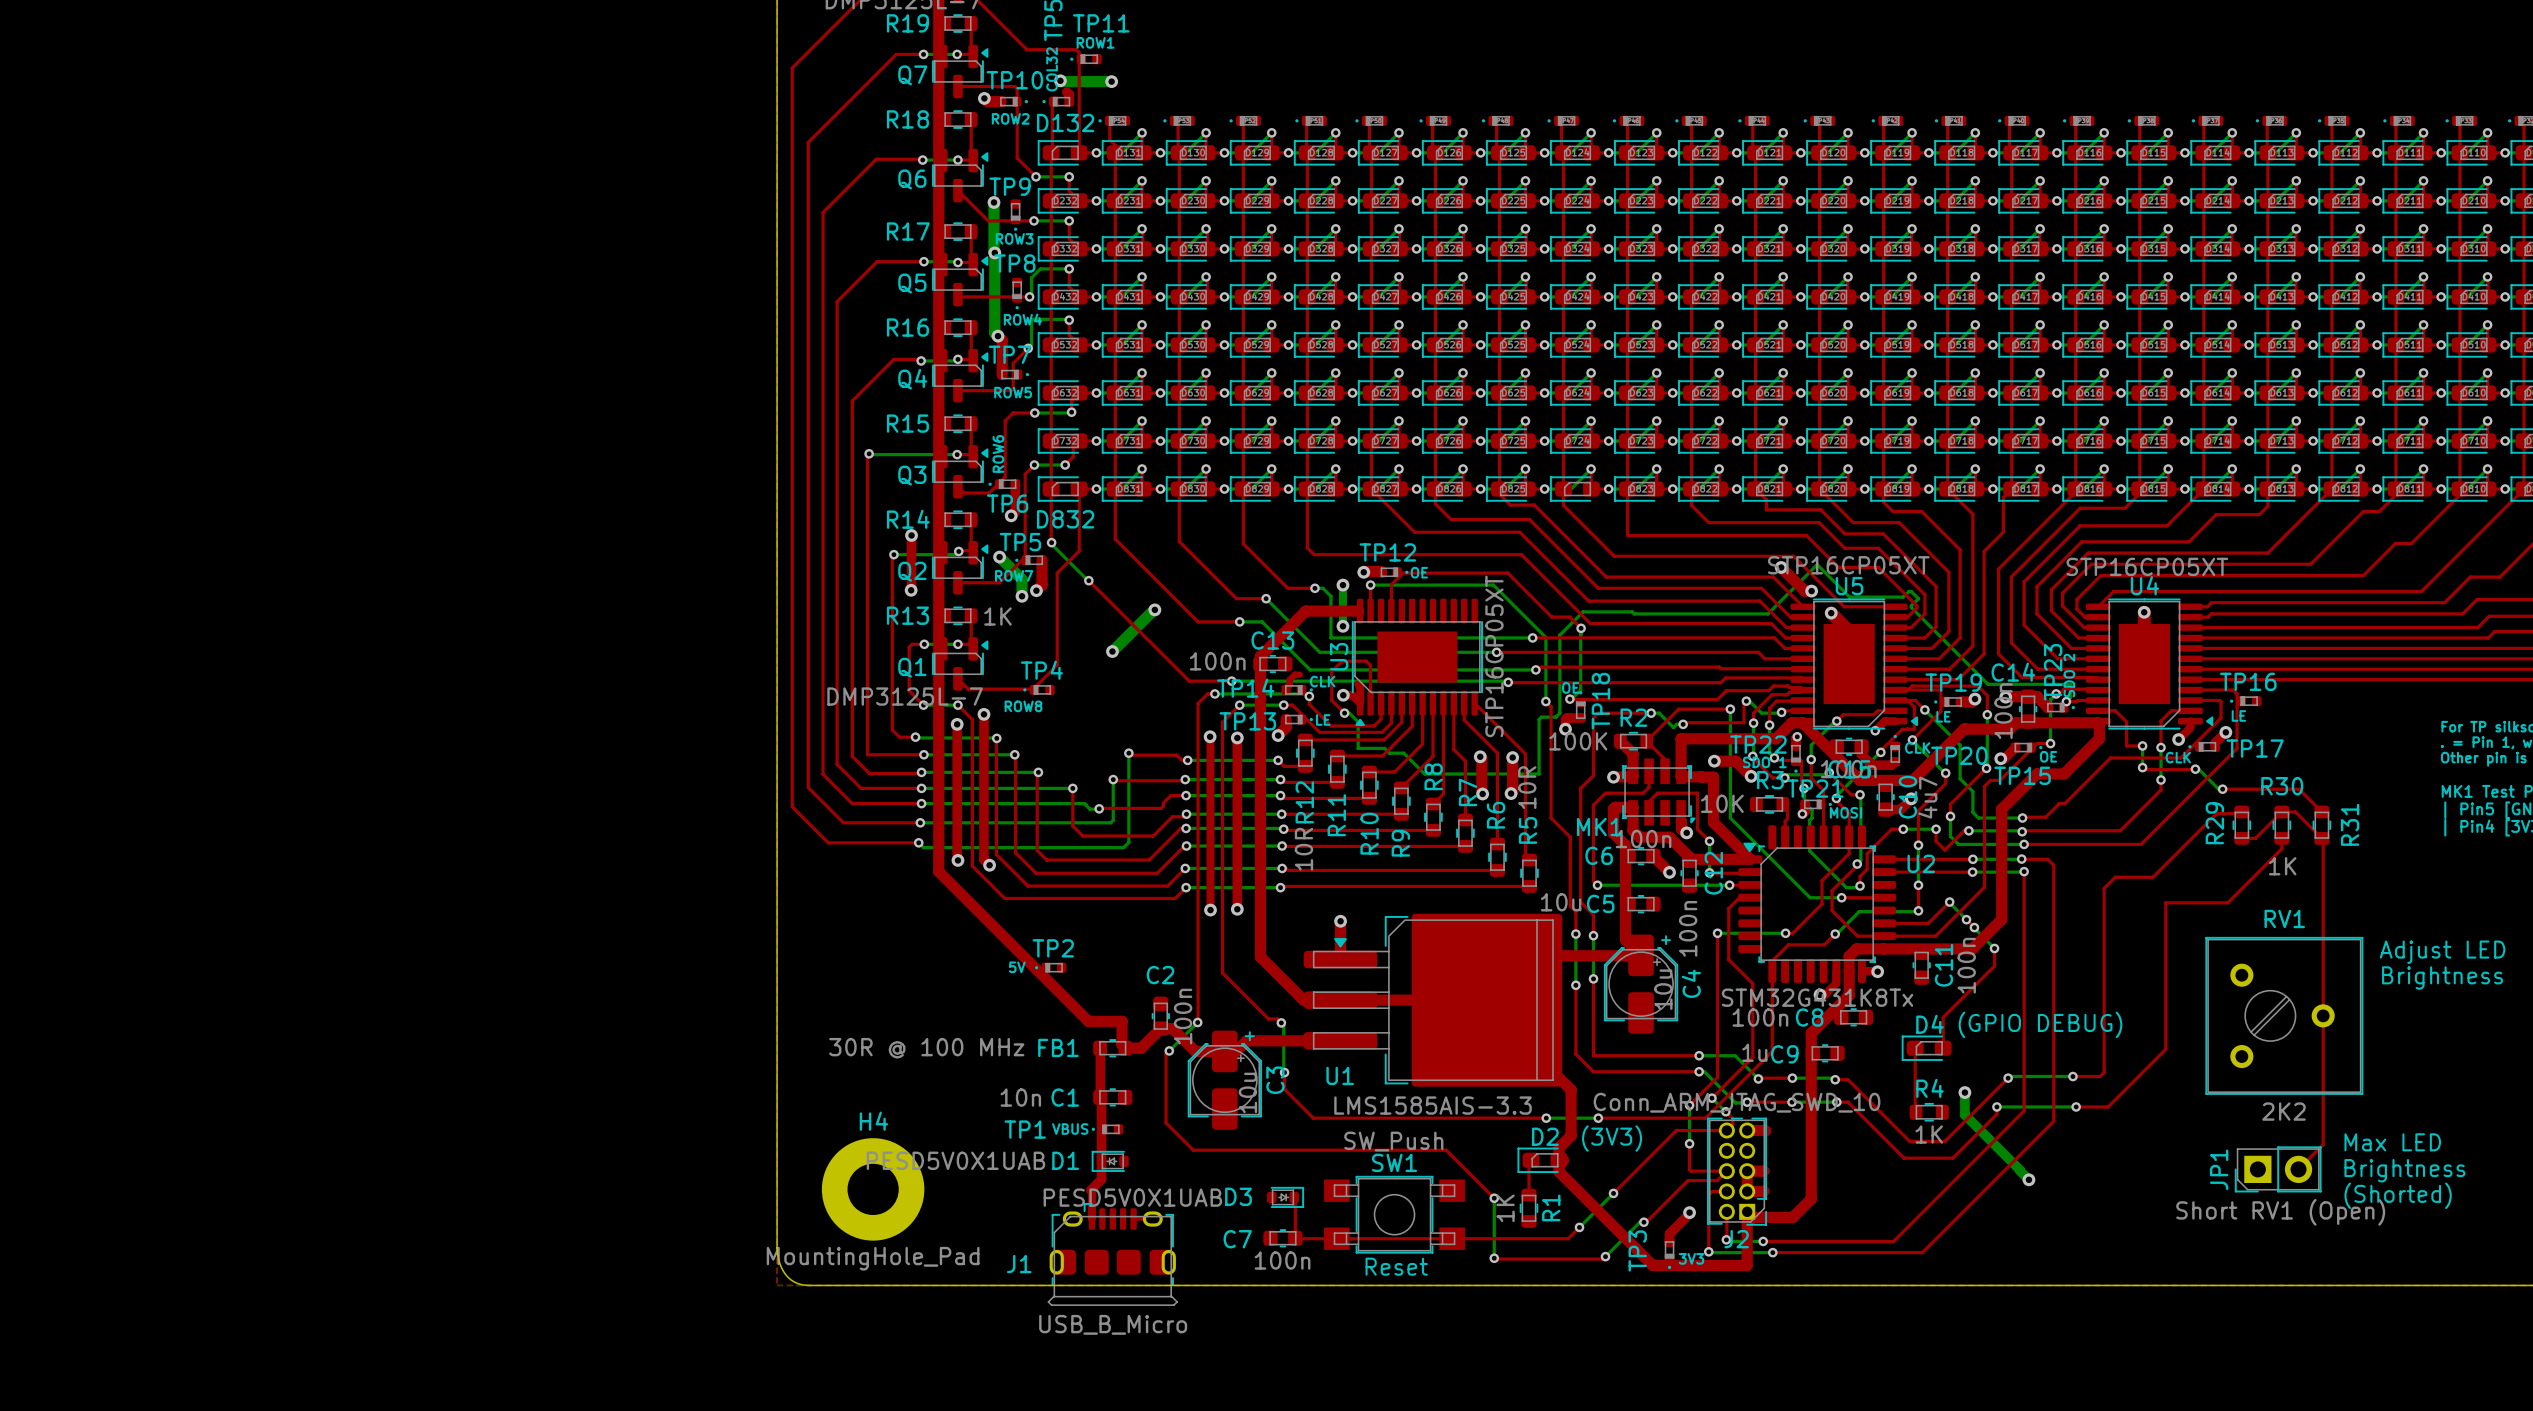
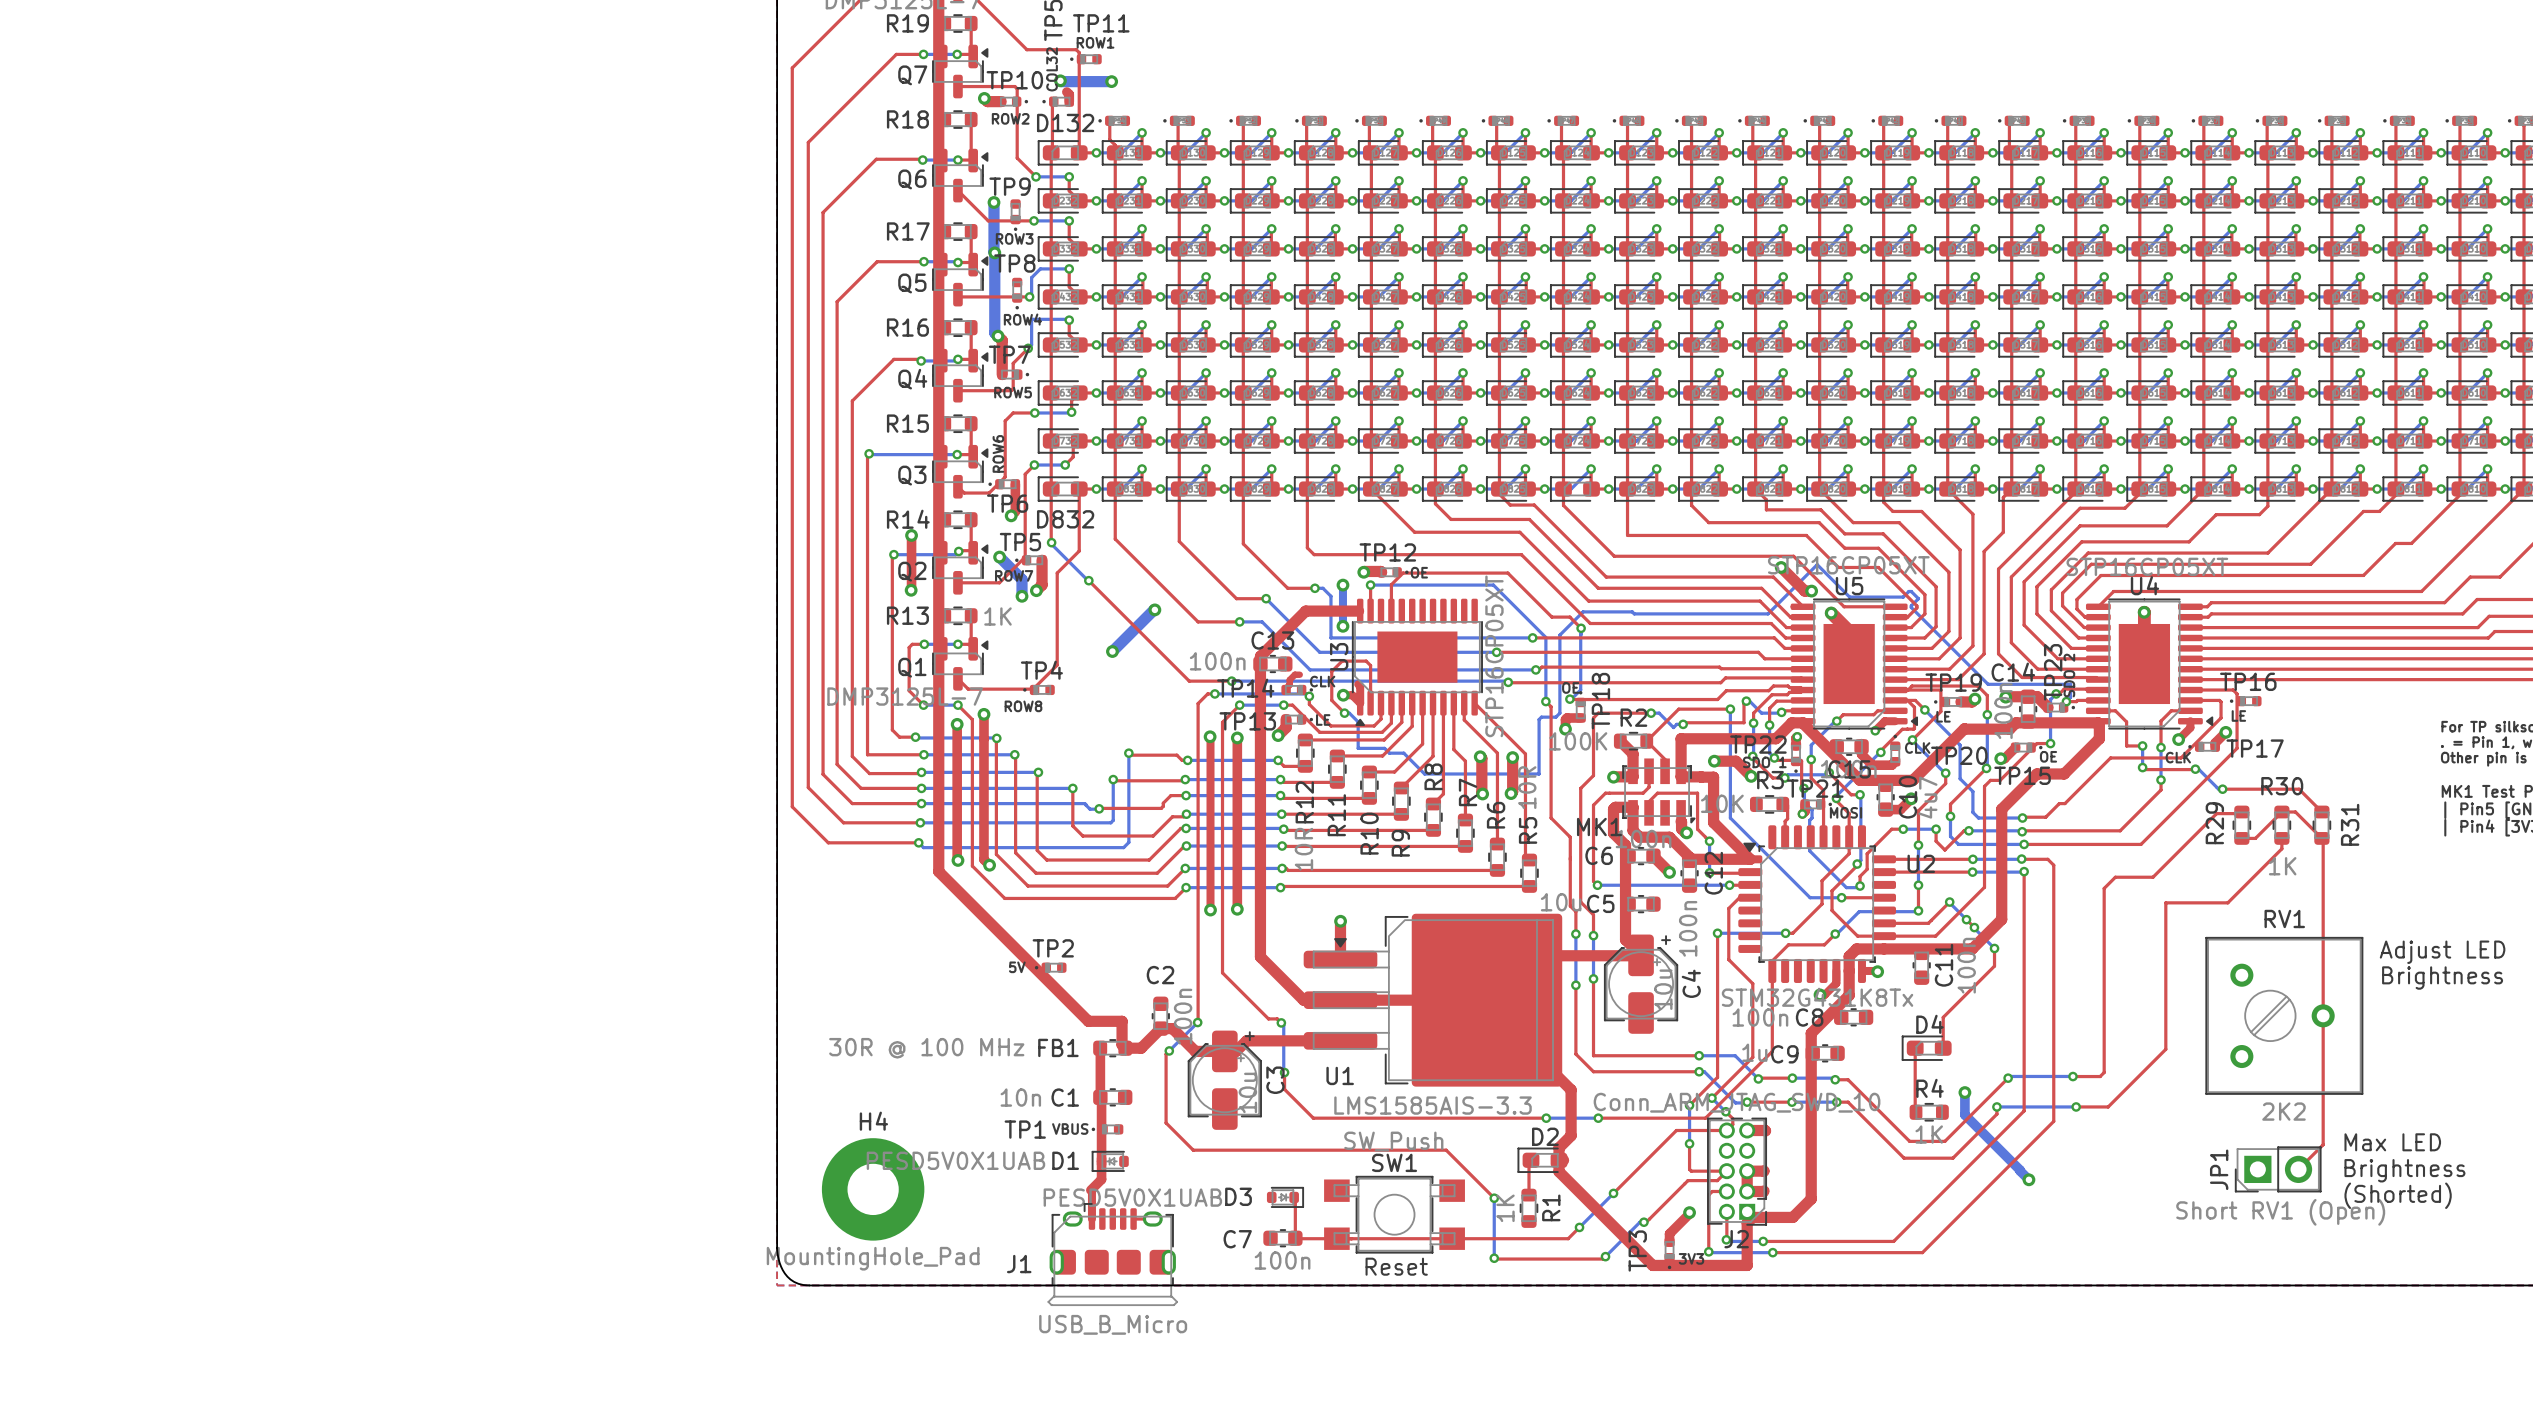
text: (GPIO DEBUG) (2040, 1024) -> none
text: (3V3) (1612, 1138) -> none

